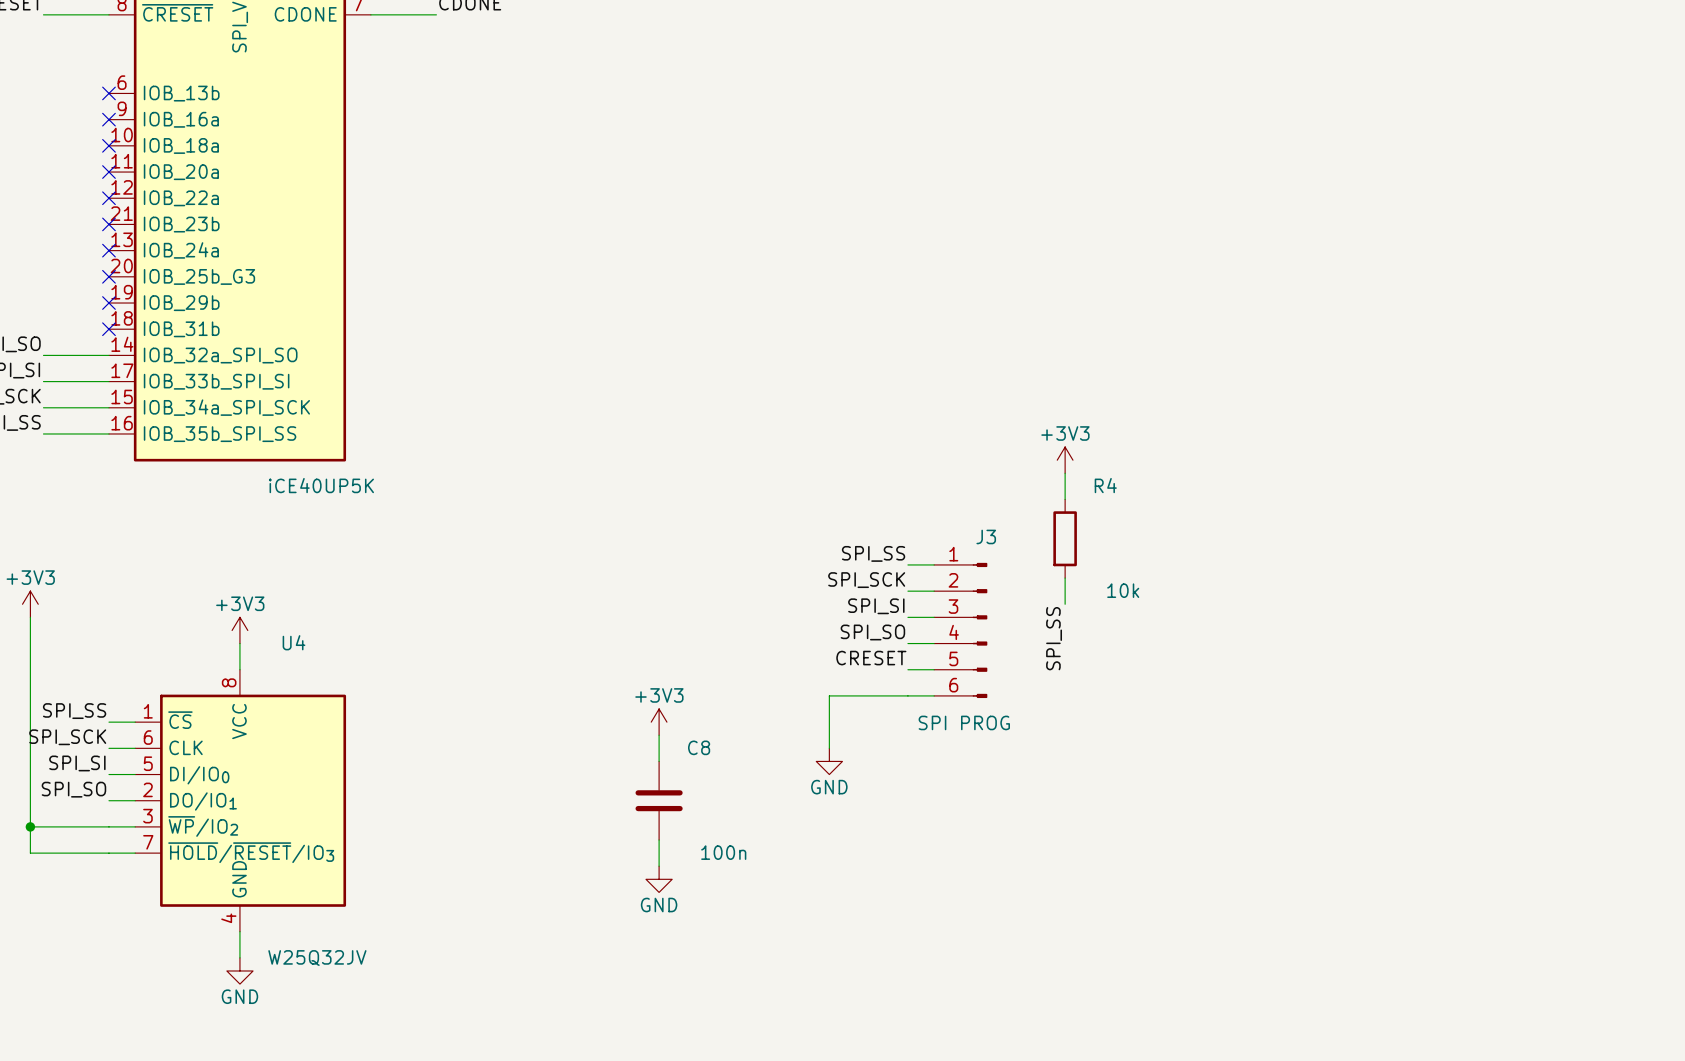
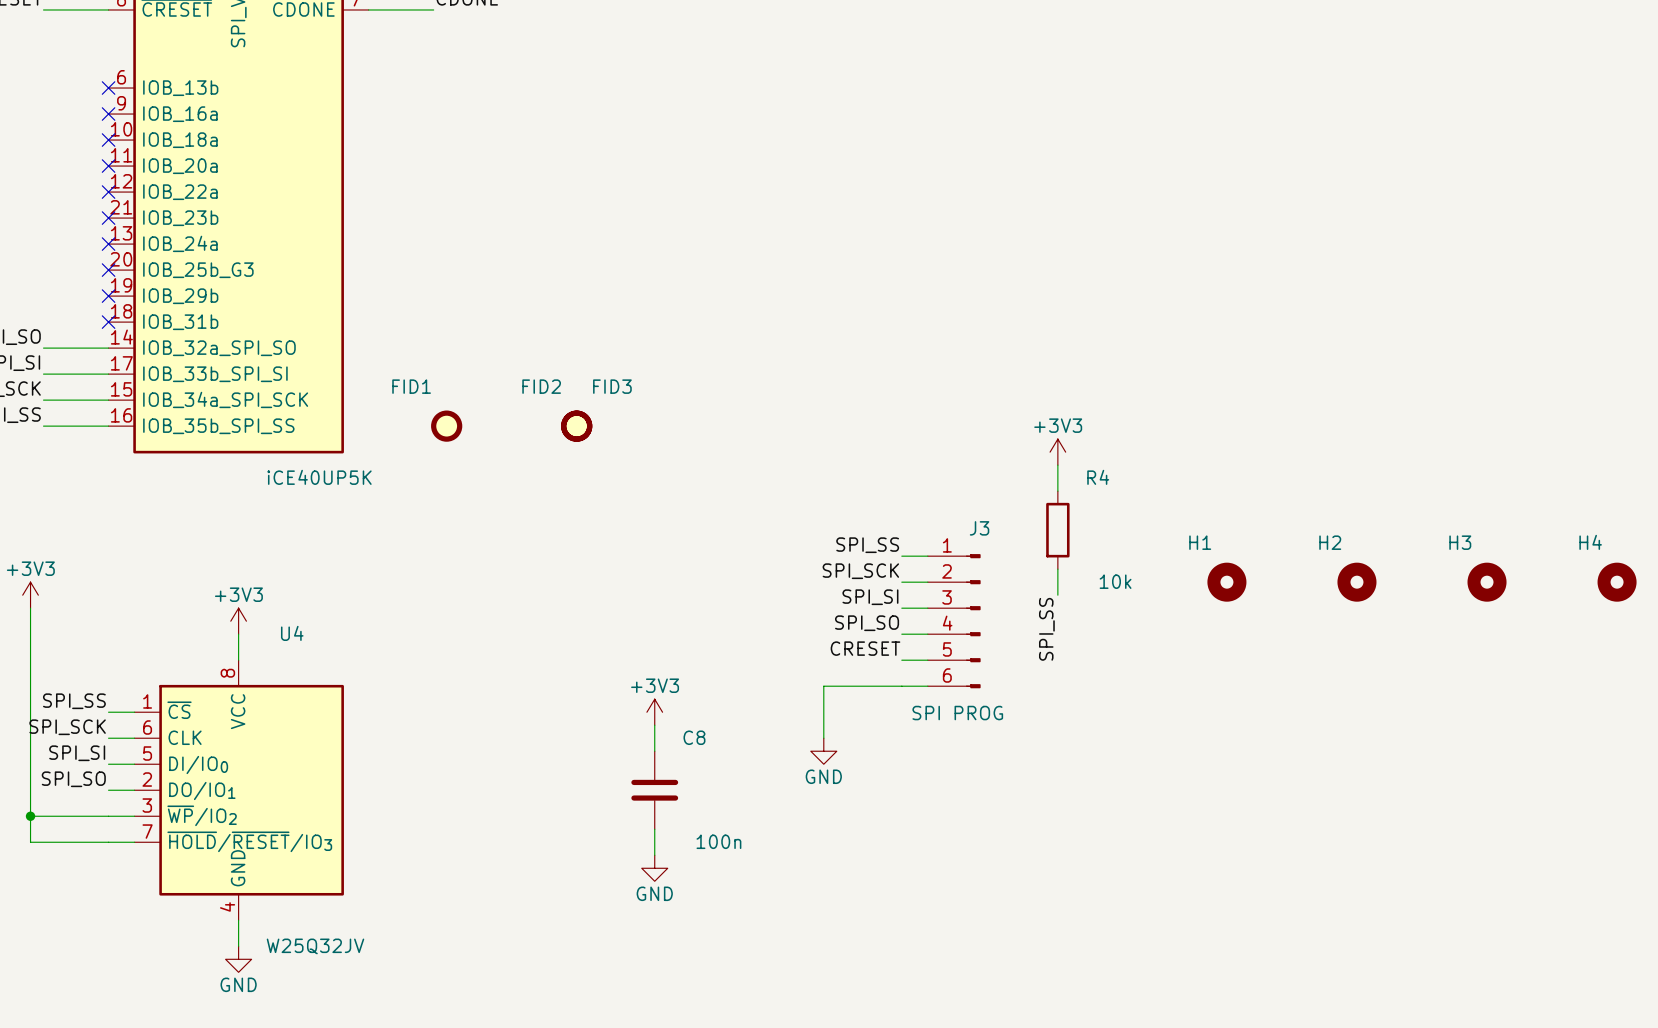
FID1: none -> (446, 426)
FID2: none -> (576, 426)
FID3: none -> (576, 426)
H1: none -> (1226, 582)
H2: none -> (1356, 582)
H3: none -> (1487, 582)
H4: none -> (1617, 582)

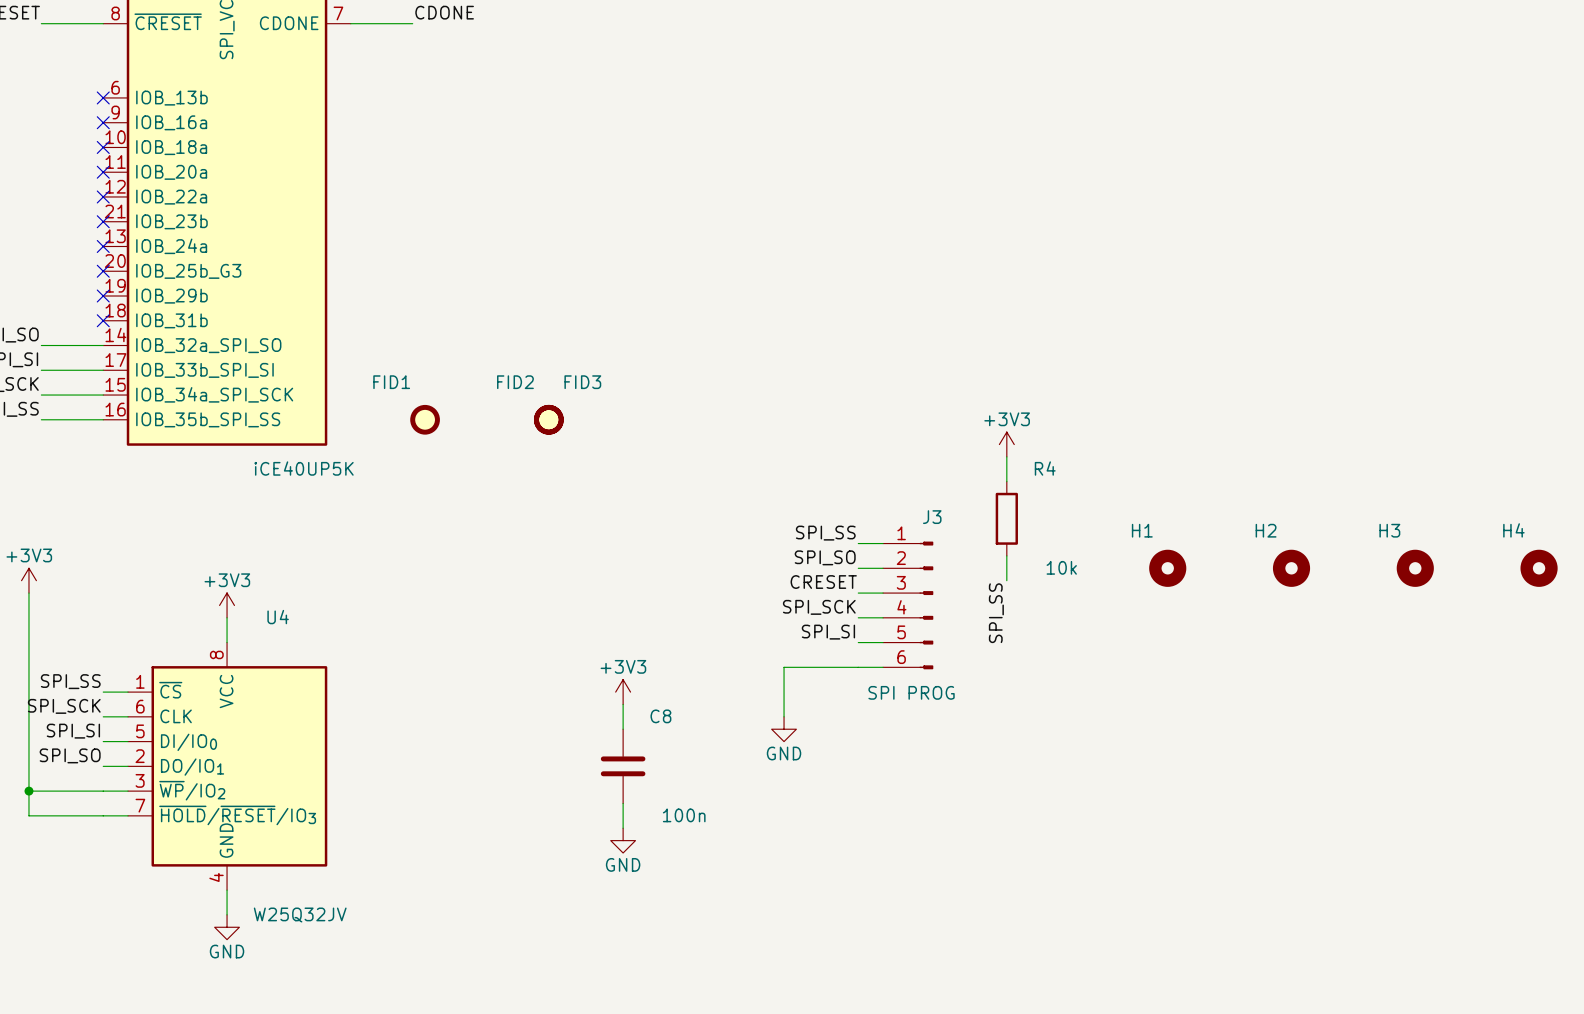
label: SPI_SCK (860, 571) -> SPI_SO (825, 557)
label: SPI_SI (870, 597) -> CRESET (823, 582)
label: SPI_SO (867, 623) -> SPI_SCK (819, 607)
label: CRESET (865, 648) -> SPI_SI (828, 632)

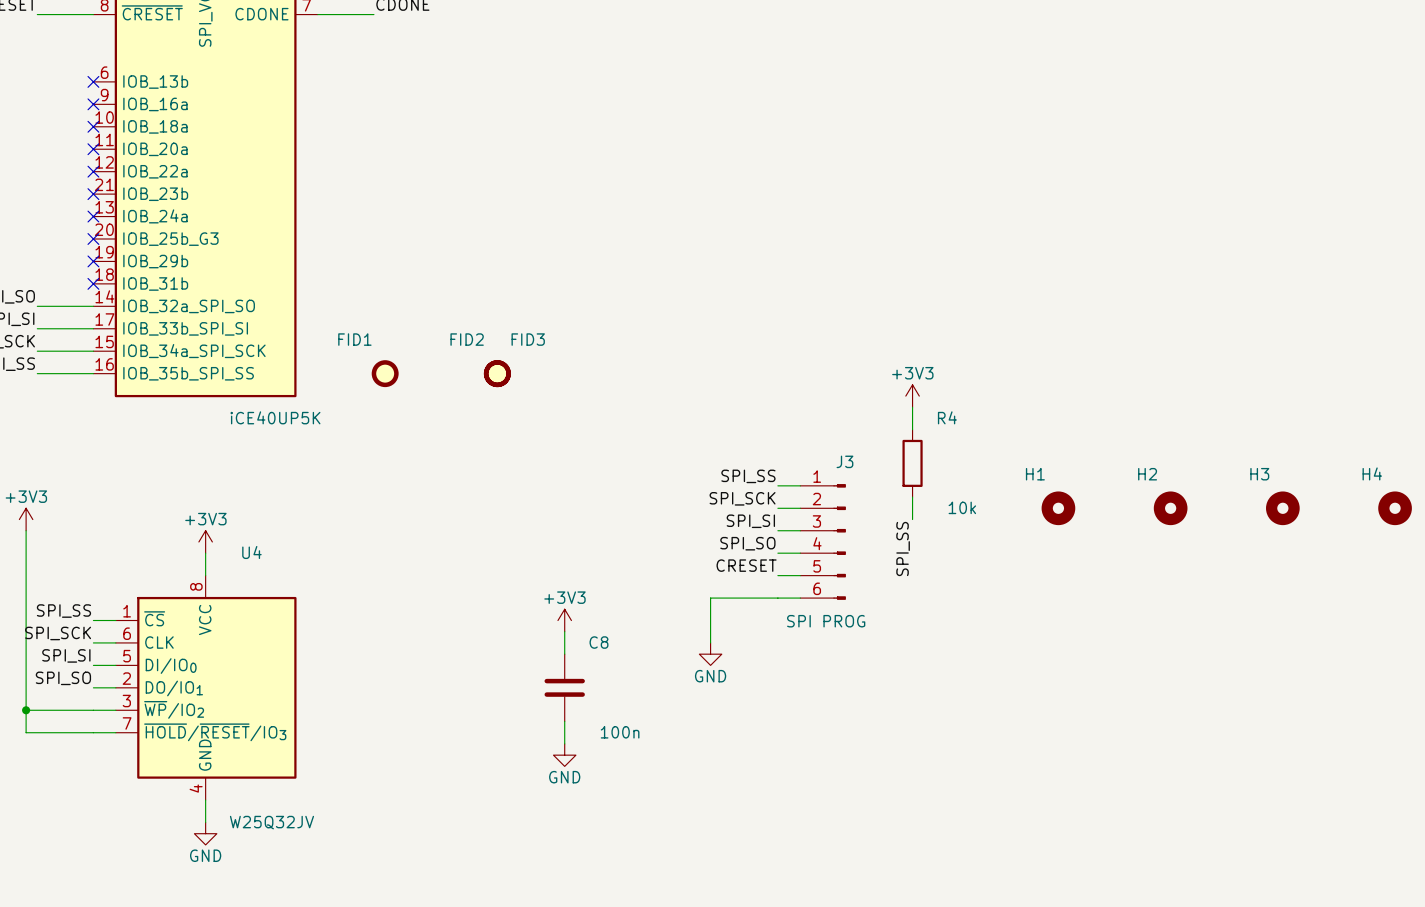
label: SPI_SO (825, 557) -> SPI_SCK (742, 498)
label: CRESET (823, 582) -> SPI_SI (750, 521)
label: SPI_SCK (819, 607) -> SPI_SO (747, 543)
label: SPI_SI (828, 632) -> CRESET (746, 565)

